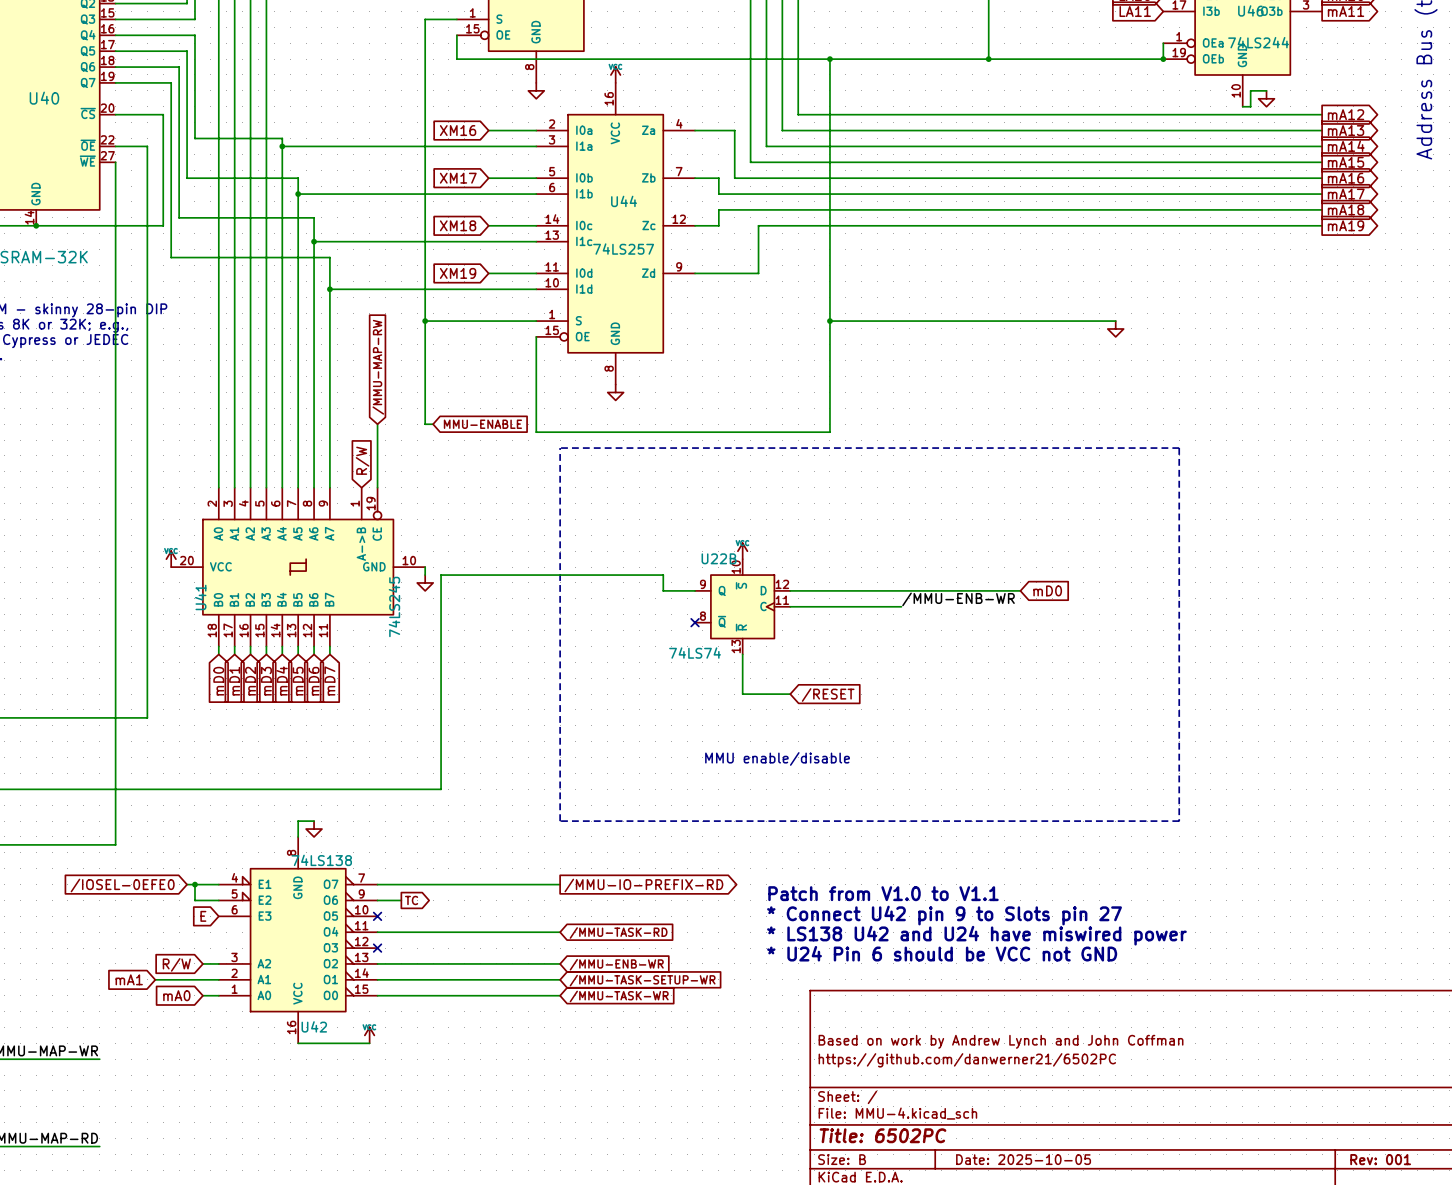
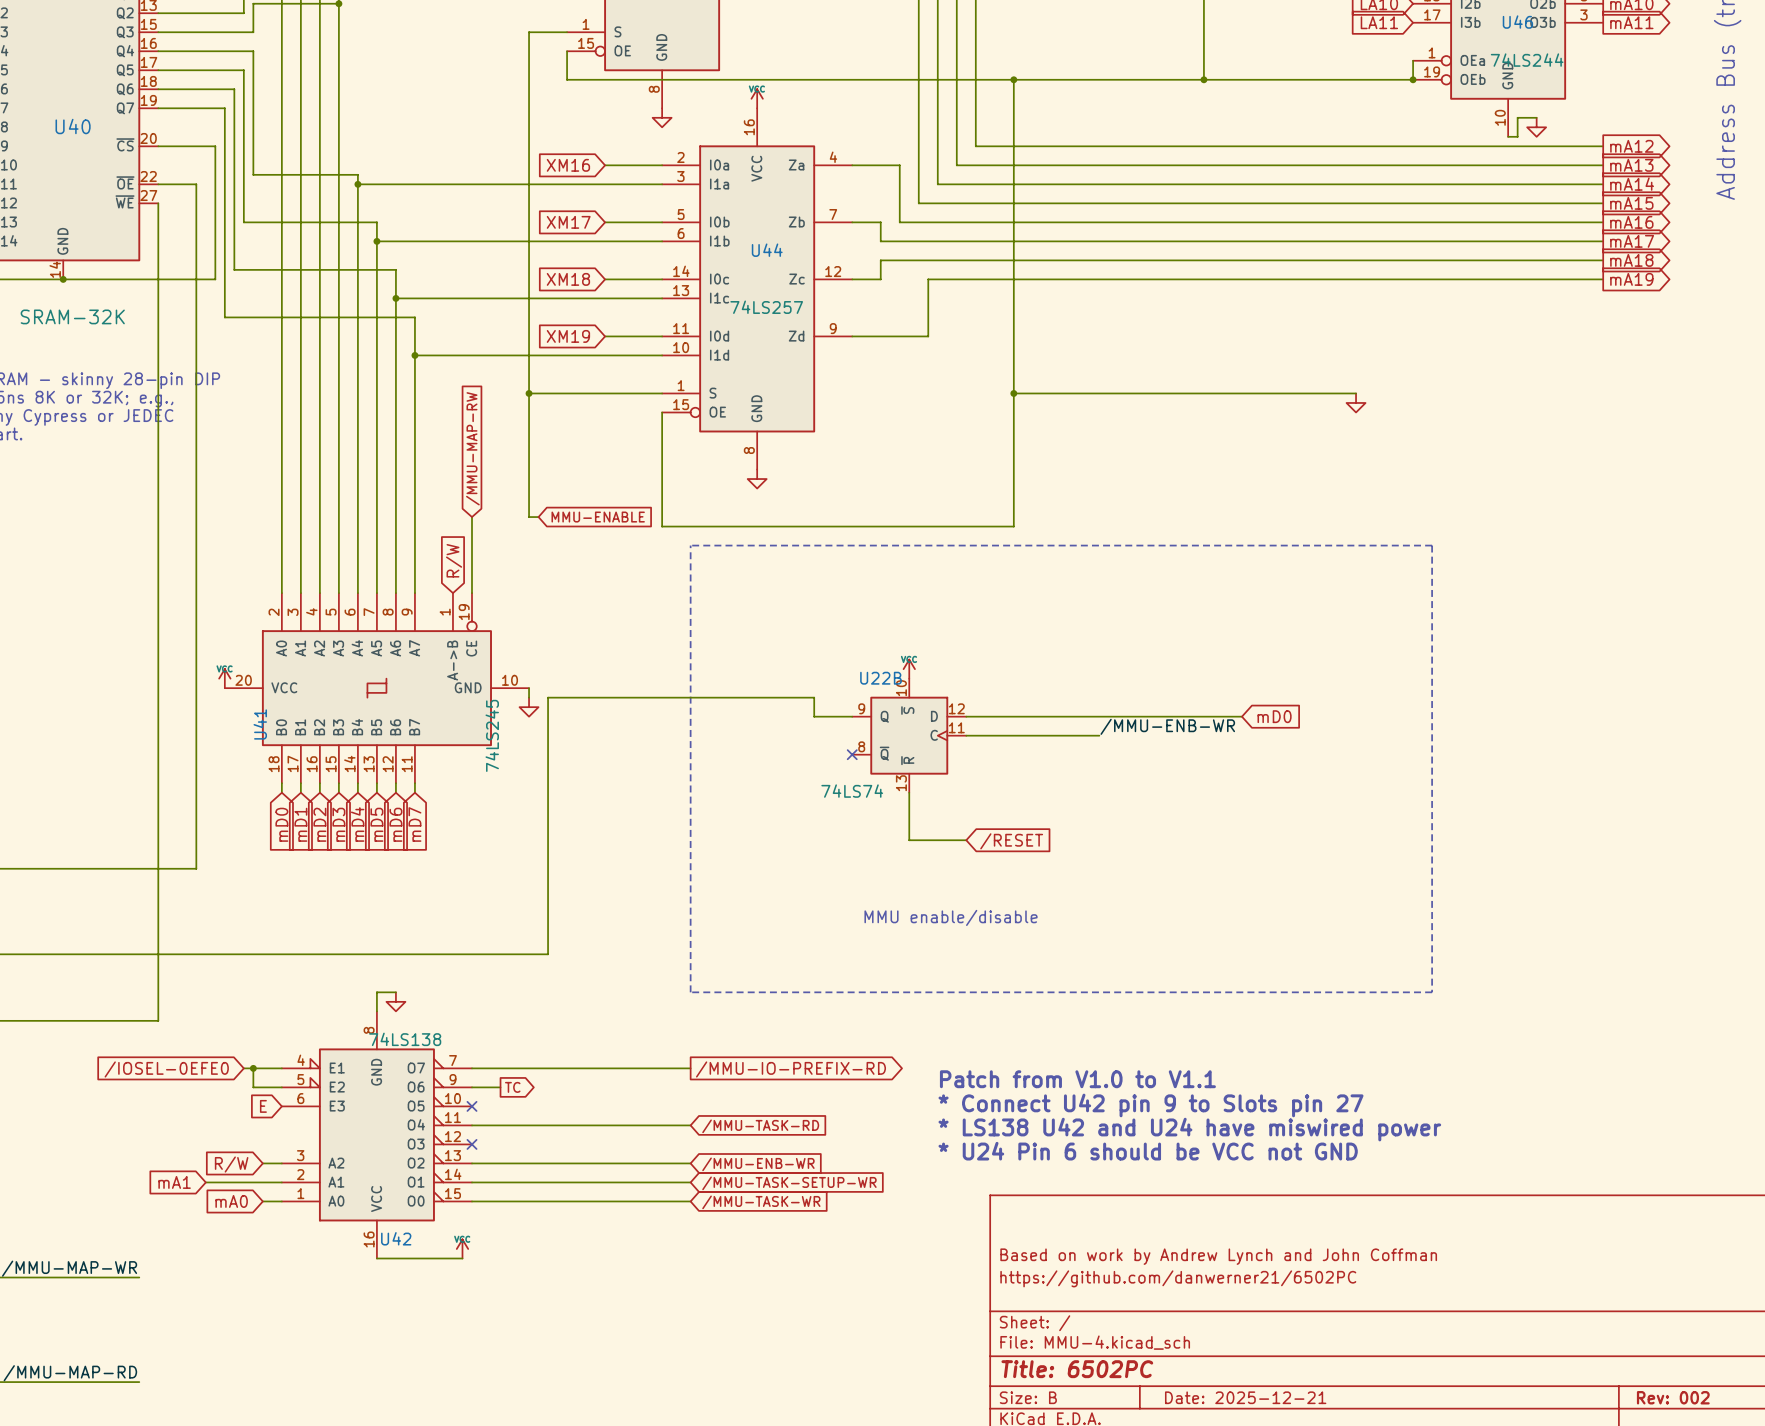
title block: Date: 2025-10-05 (1023, 1159) -> Date: 2025-12-21 (1245, 1397)
title block: Rev: 001 (1380, 1159) -> Rev: 002 (1673, 1397)

